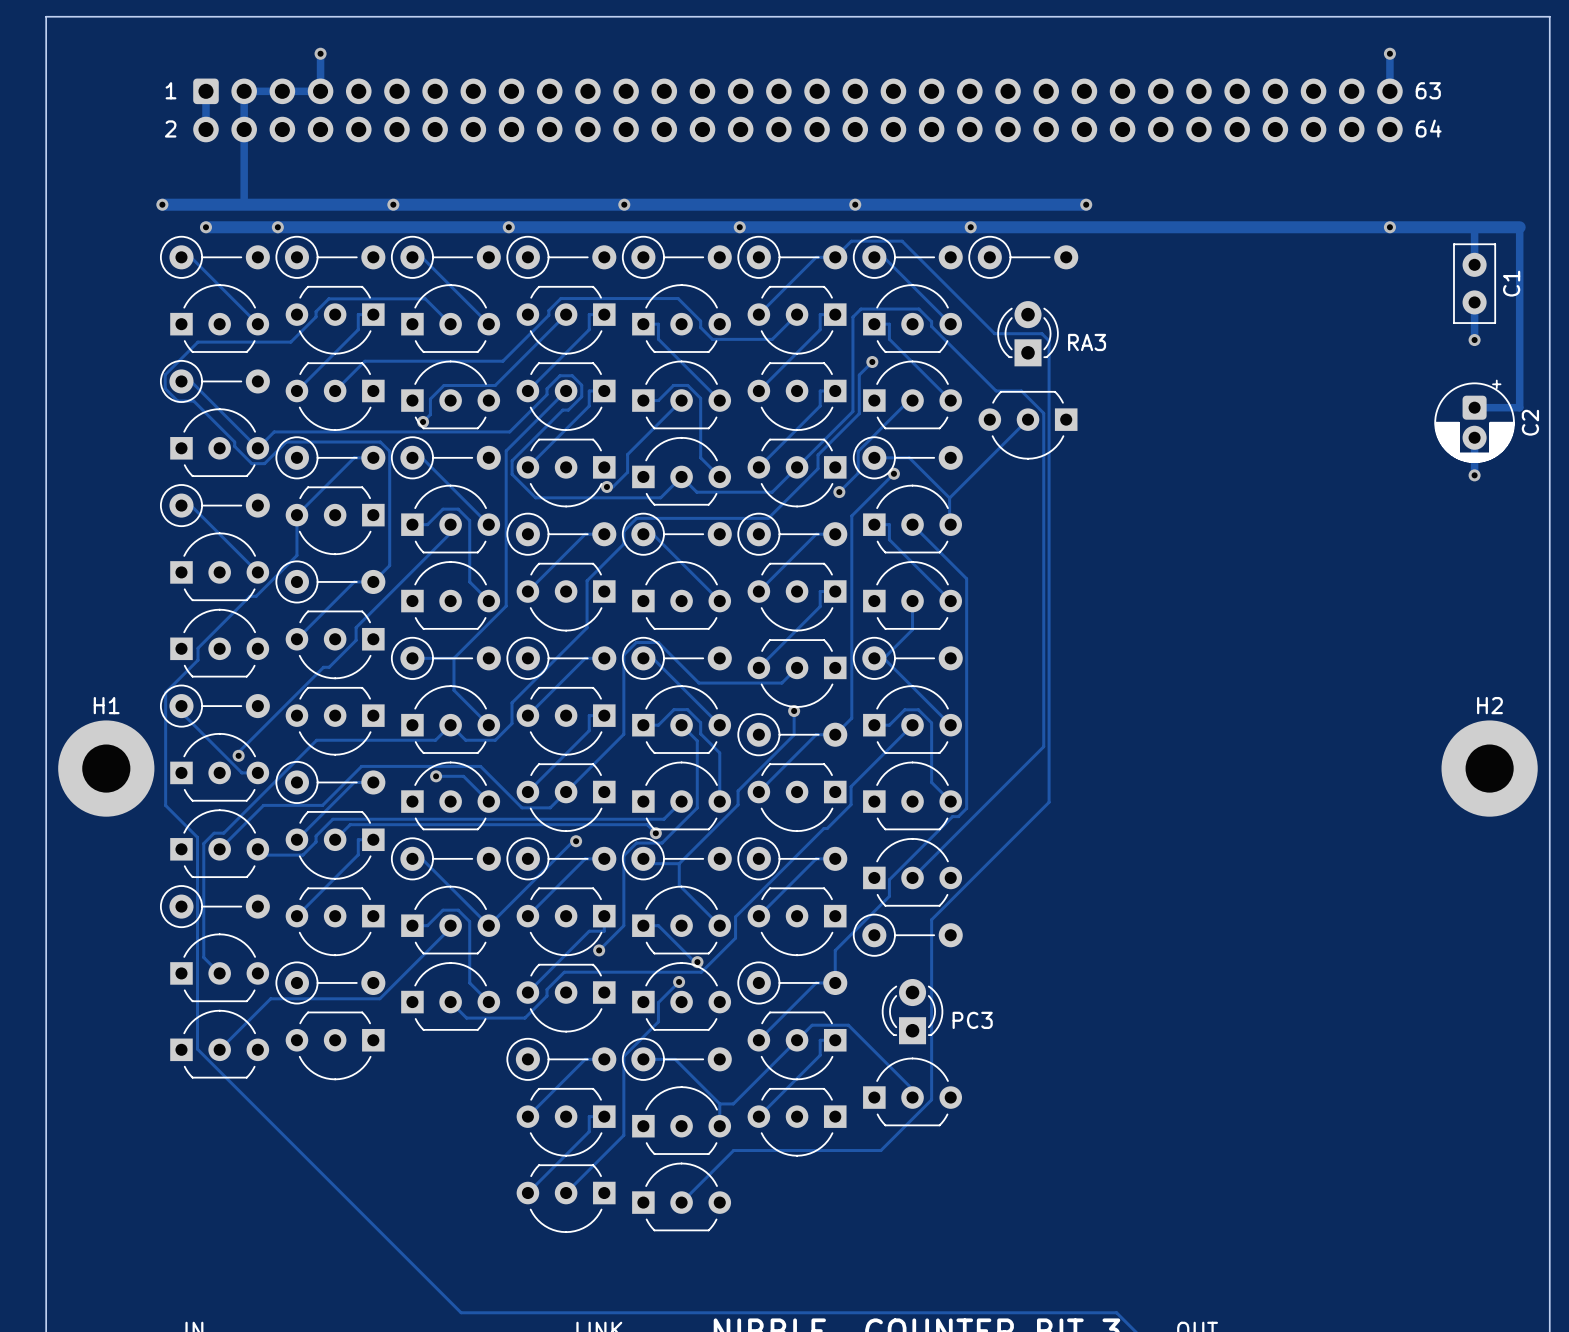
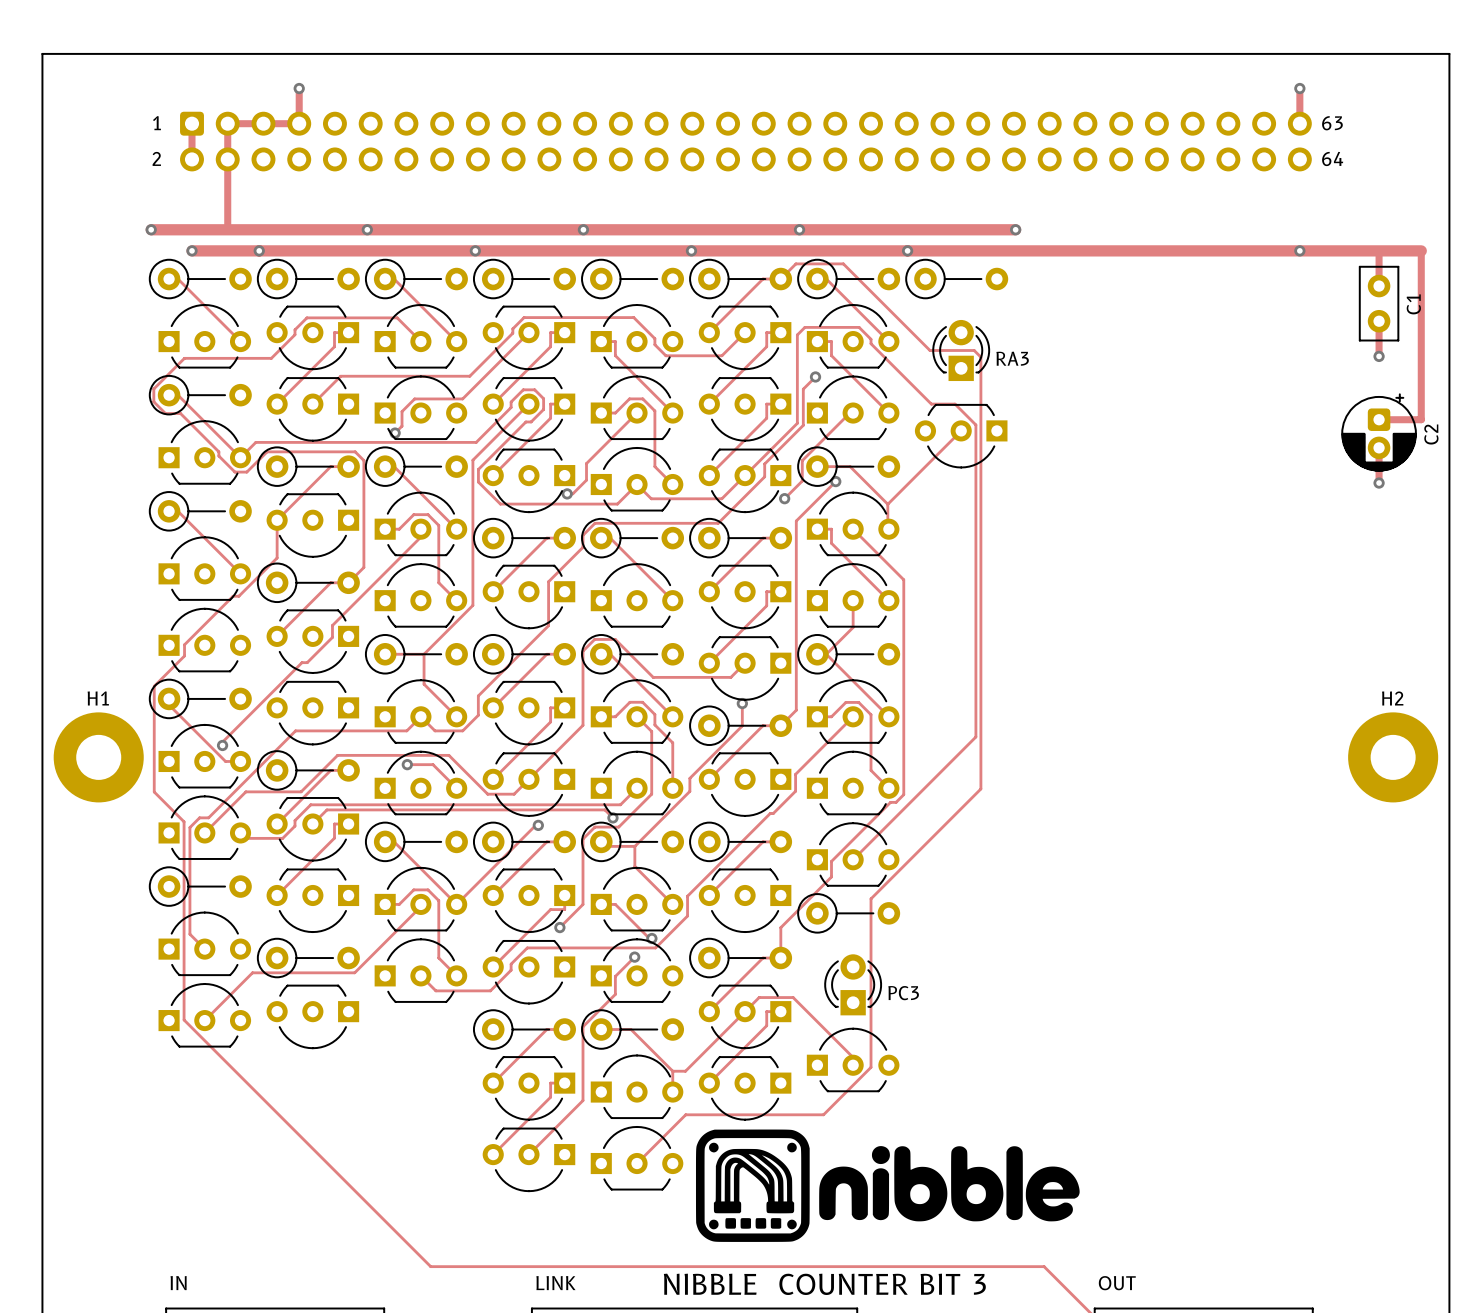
drawing: none -> [695, 1129, 1080, 1242]

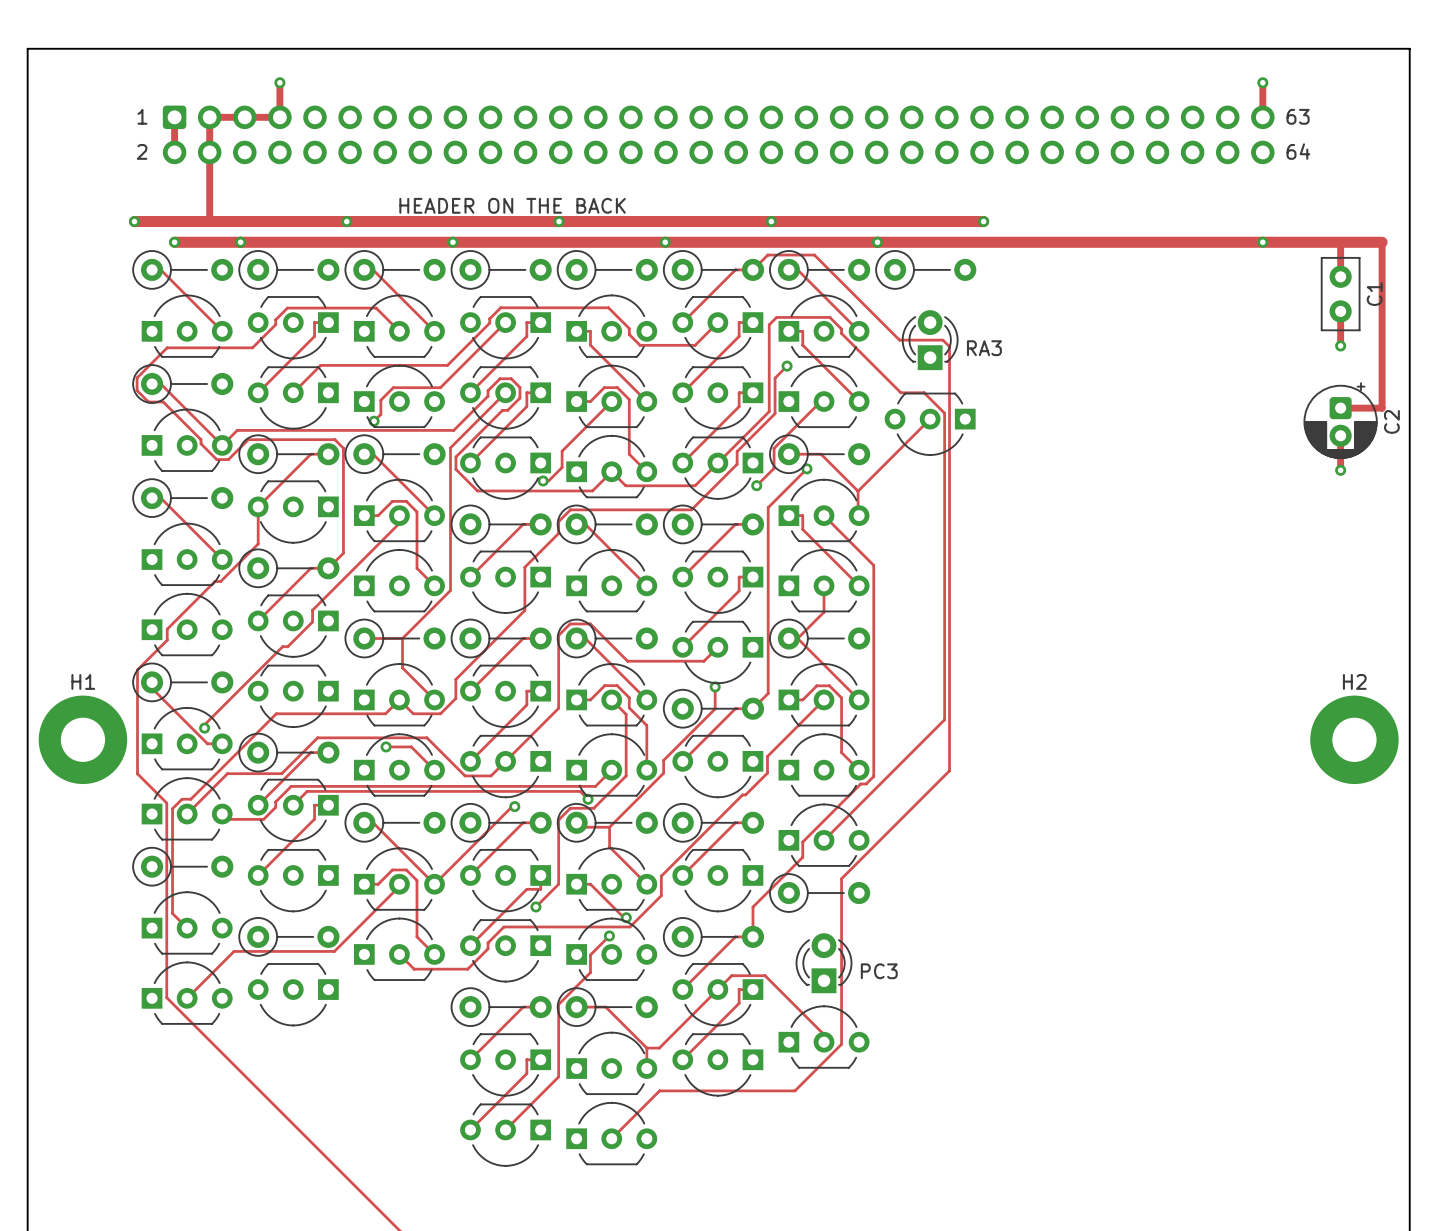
text: none -> HEADER ON THE BACK (512, 205)
drawing: [695, 1129, 1080, 1242] -> none

